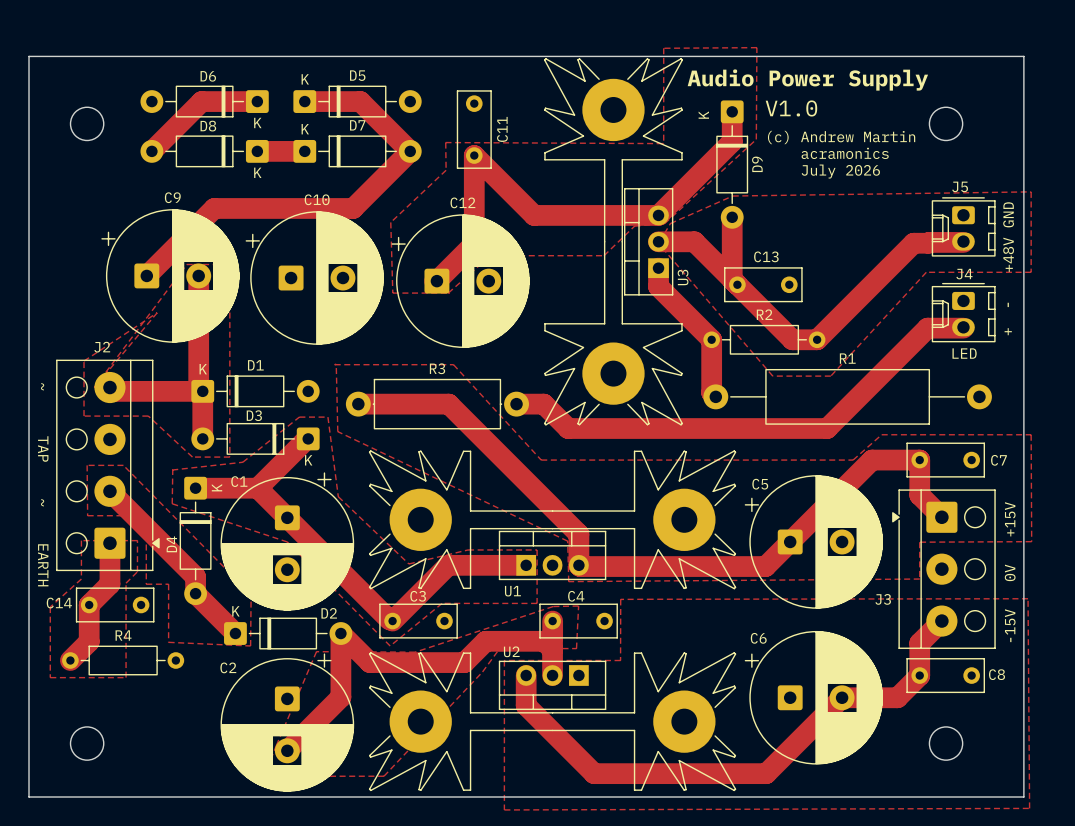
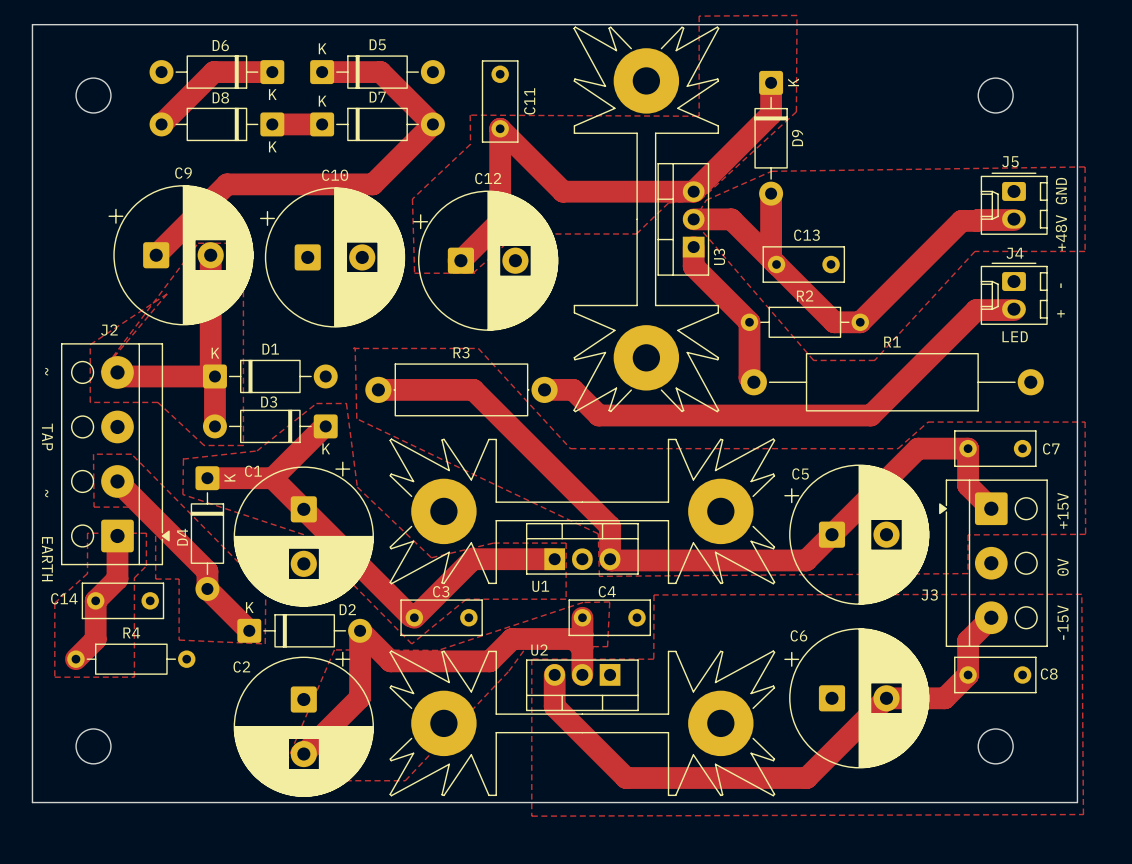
text: Audio Power Supply (807, 80) -> none
text: V1.0 (791, 108) -> none
D9 text position: K (703, 115) -> K (793, 82)
text: (c) Andrew Martin (841, 137) -> none
text: acramonics (845, 153) -> none
text: July 2026 (840, 171) -> none

